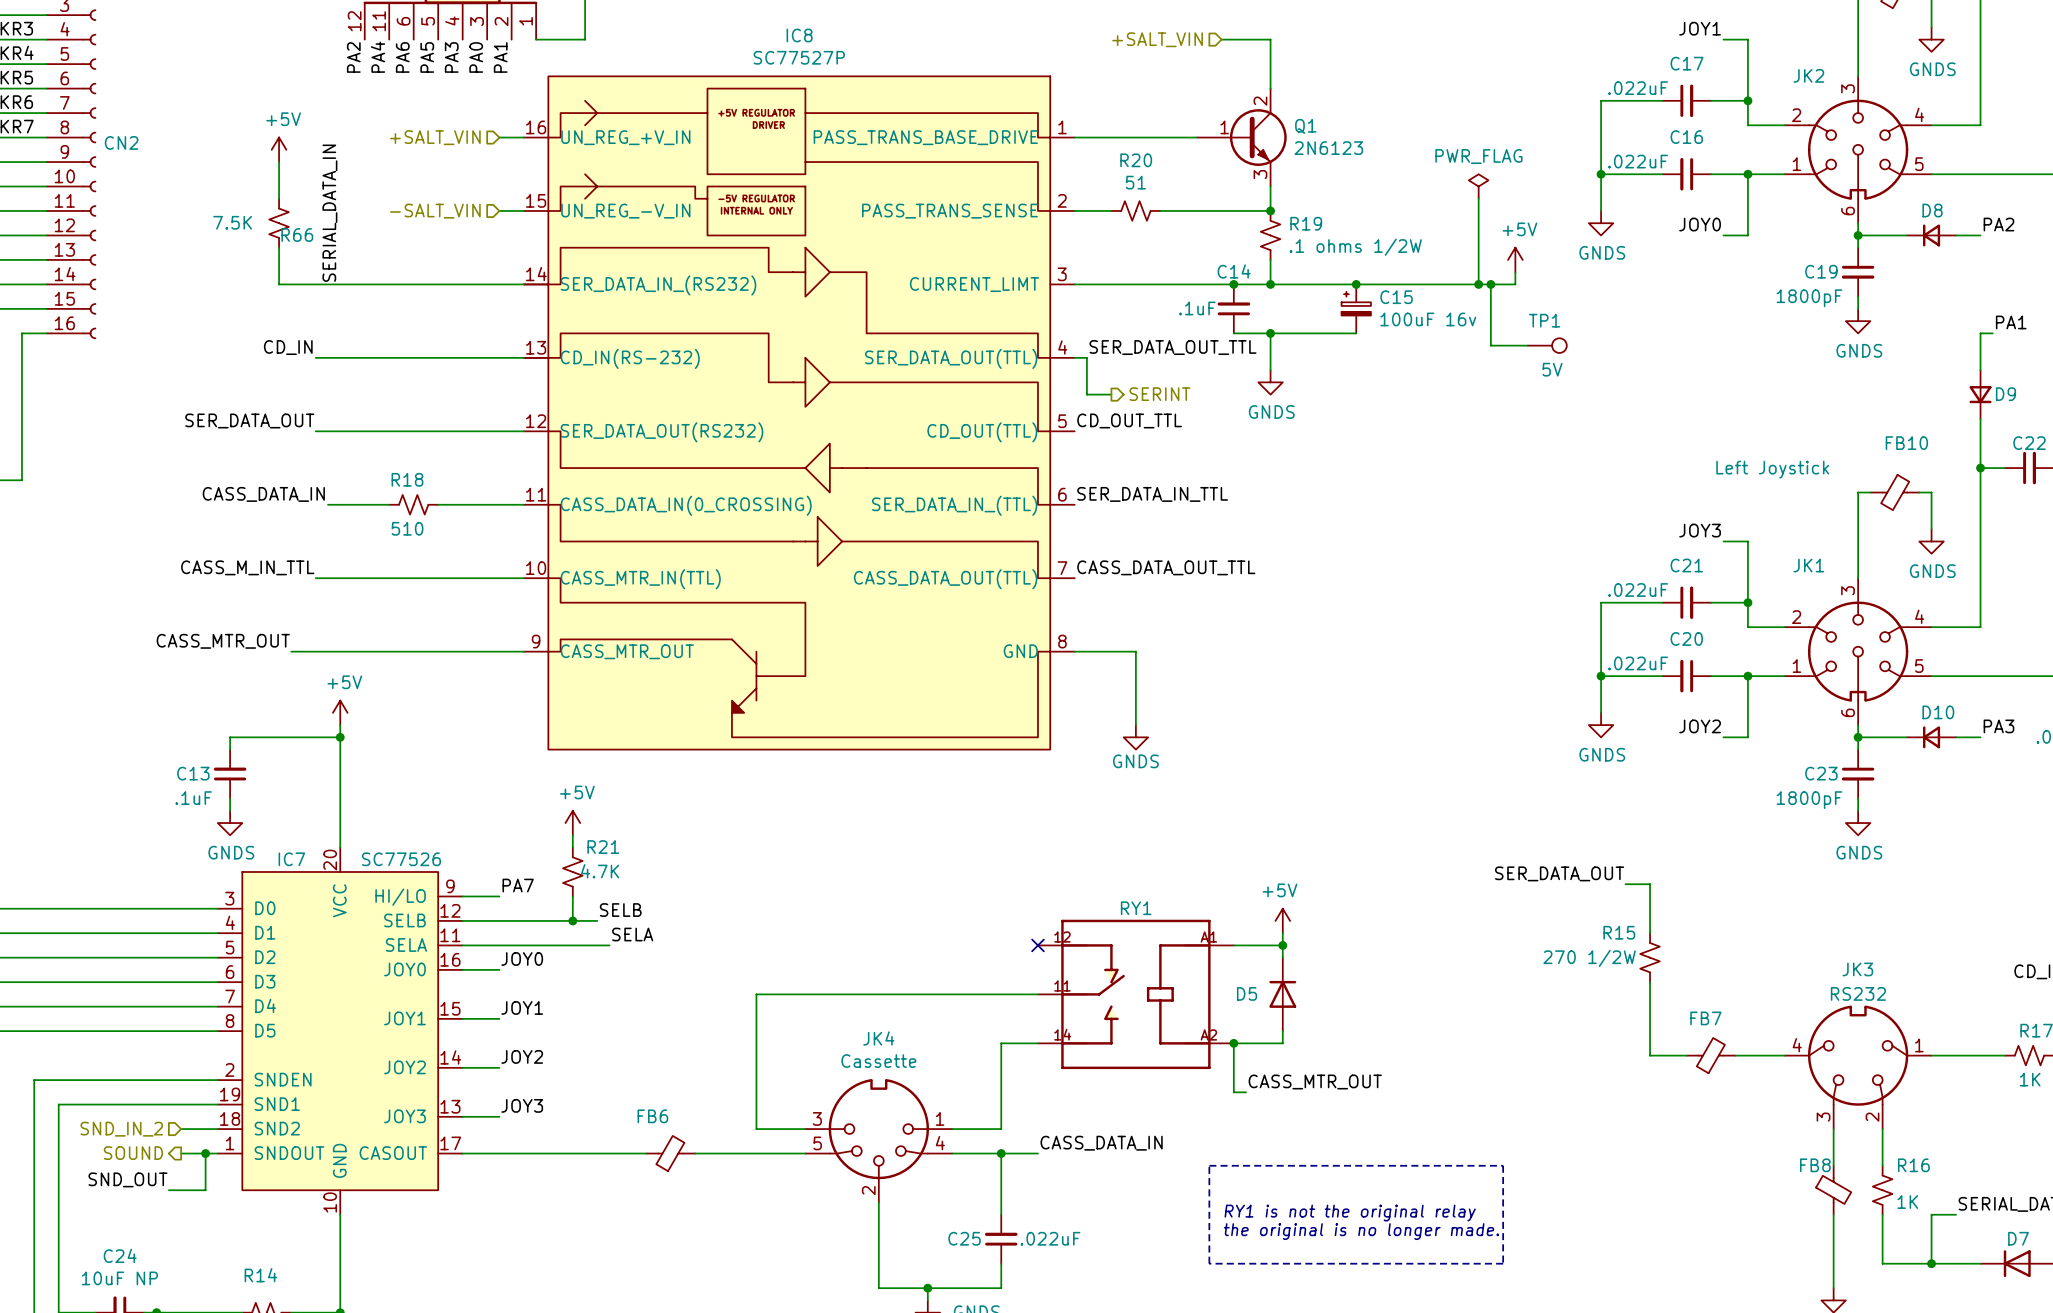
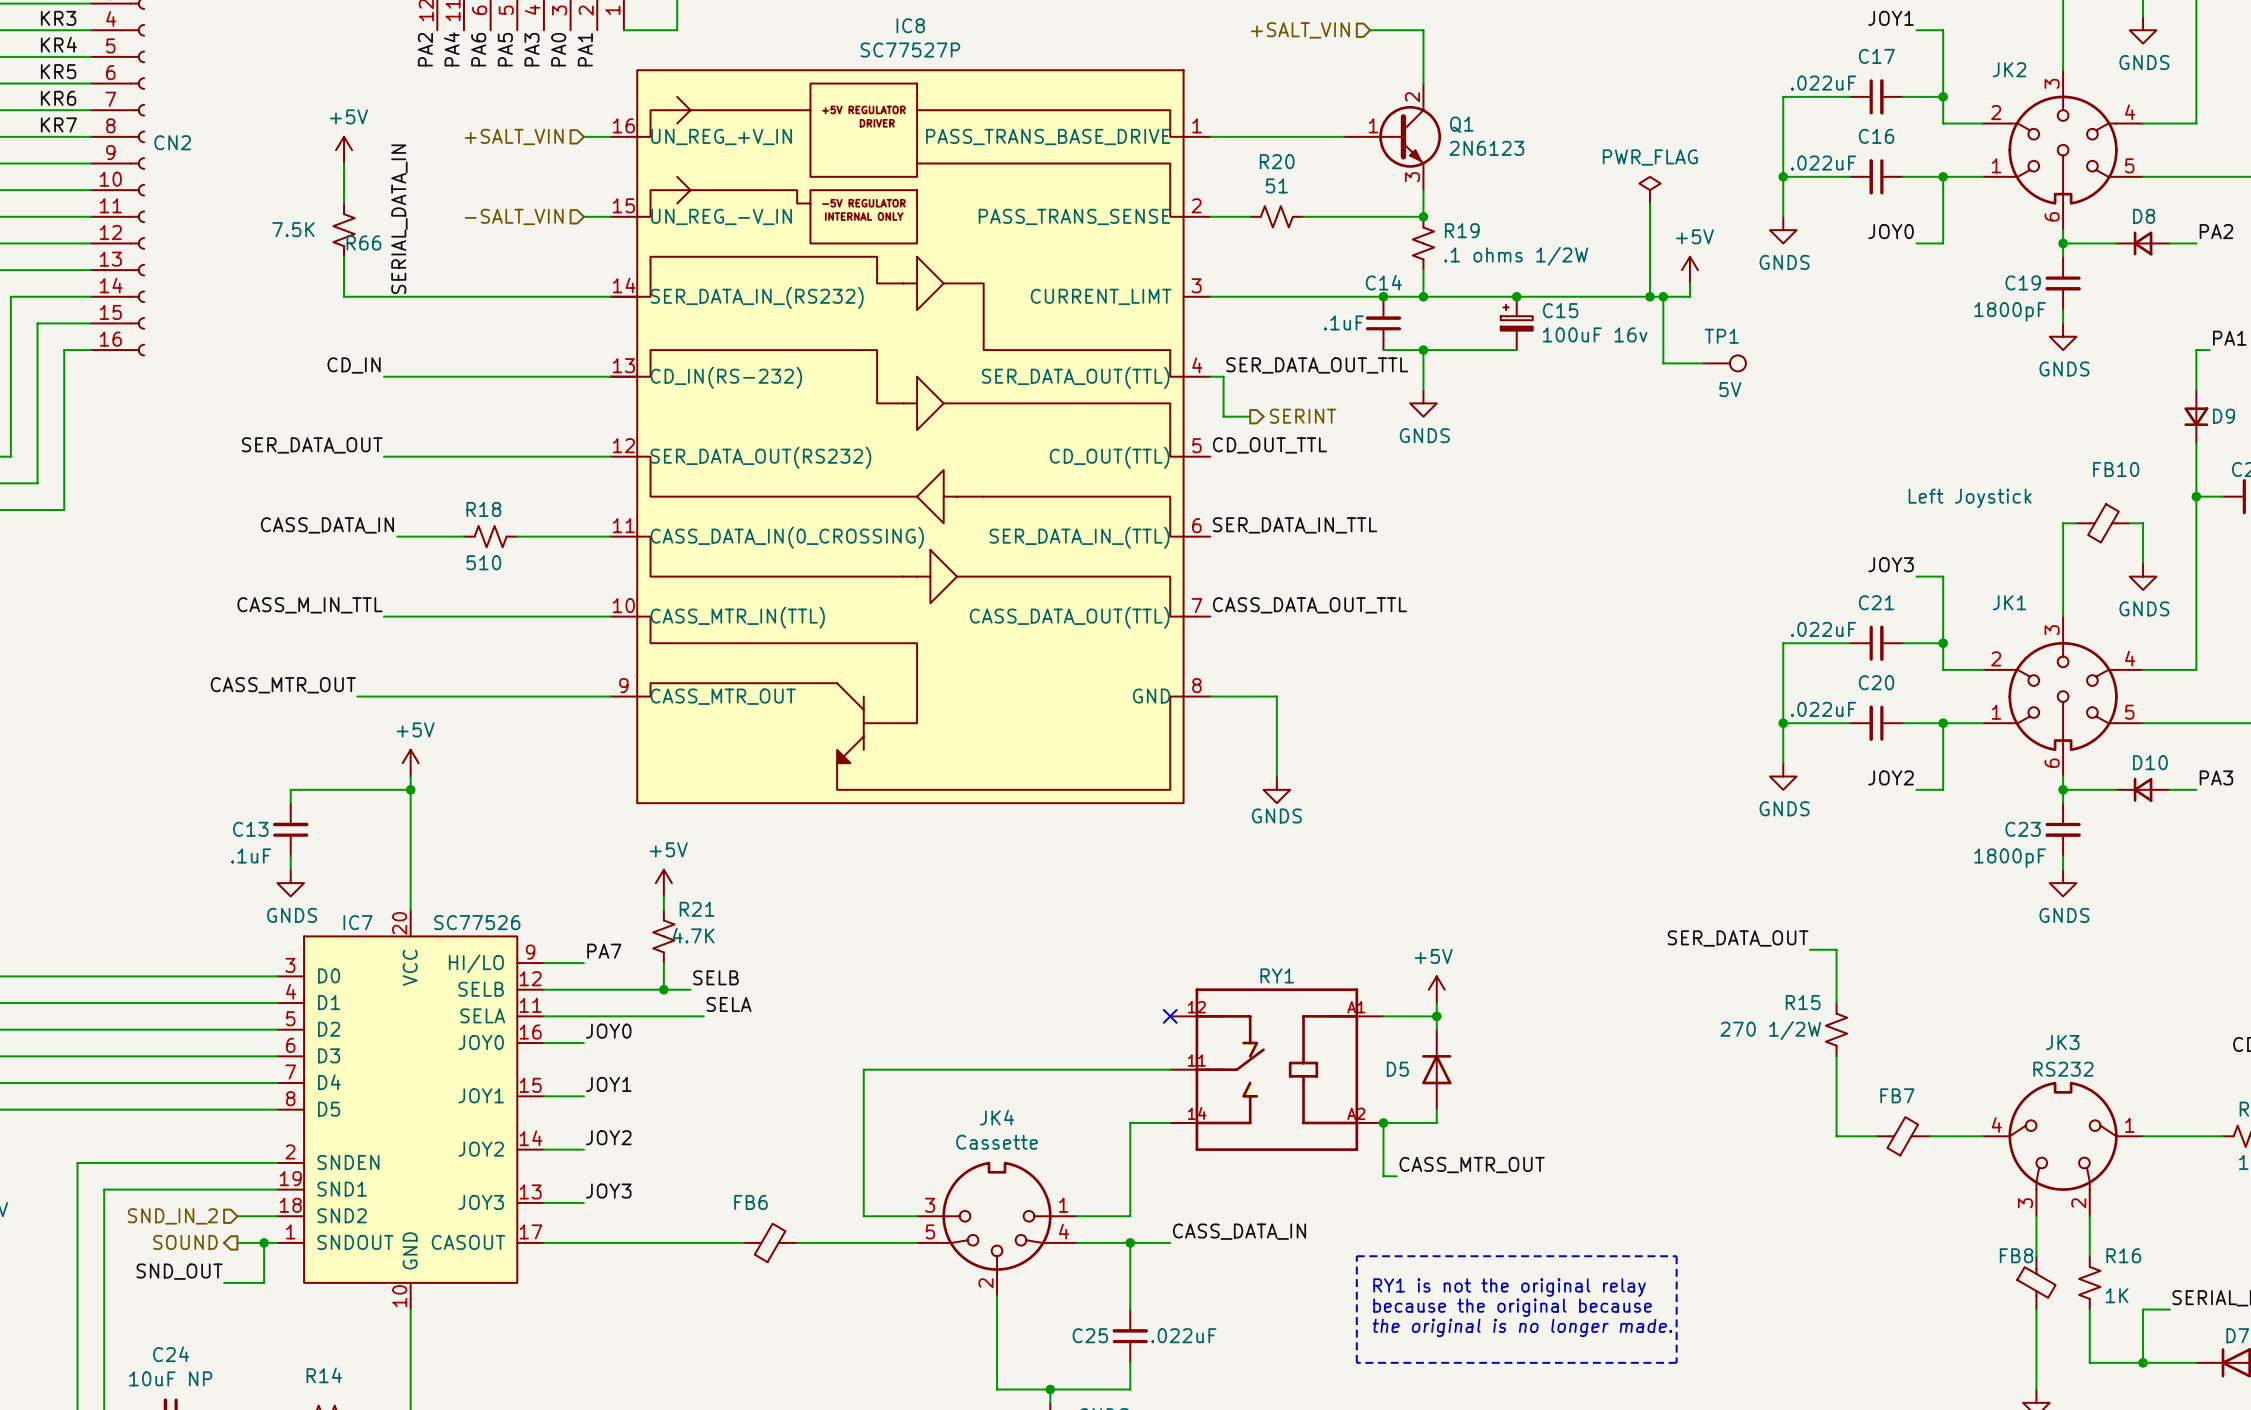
text: none -> RY1 is not the original relay (1509, 1287)
text: RY1 is not the original relay (1350, 1213) -> because the original because (1512, 1307)

